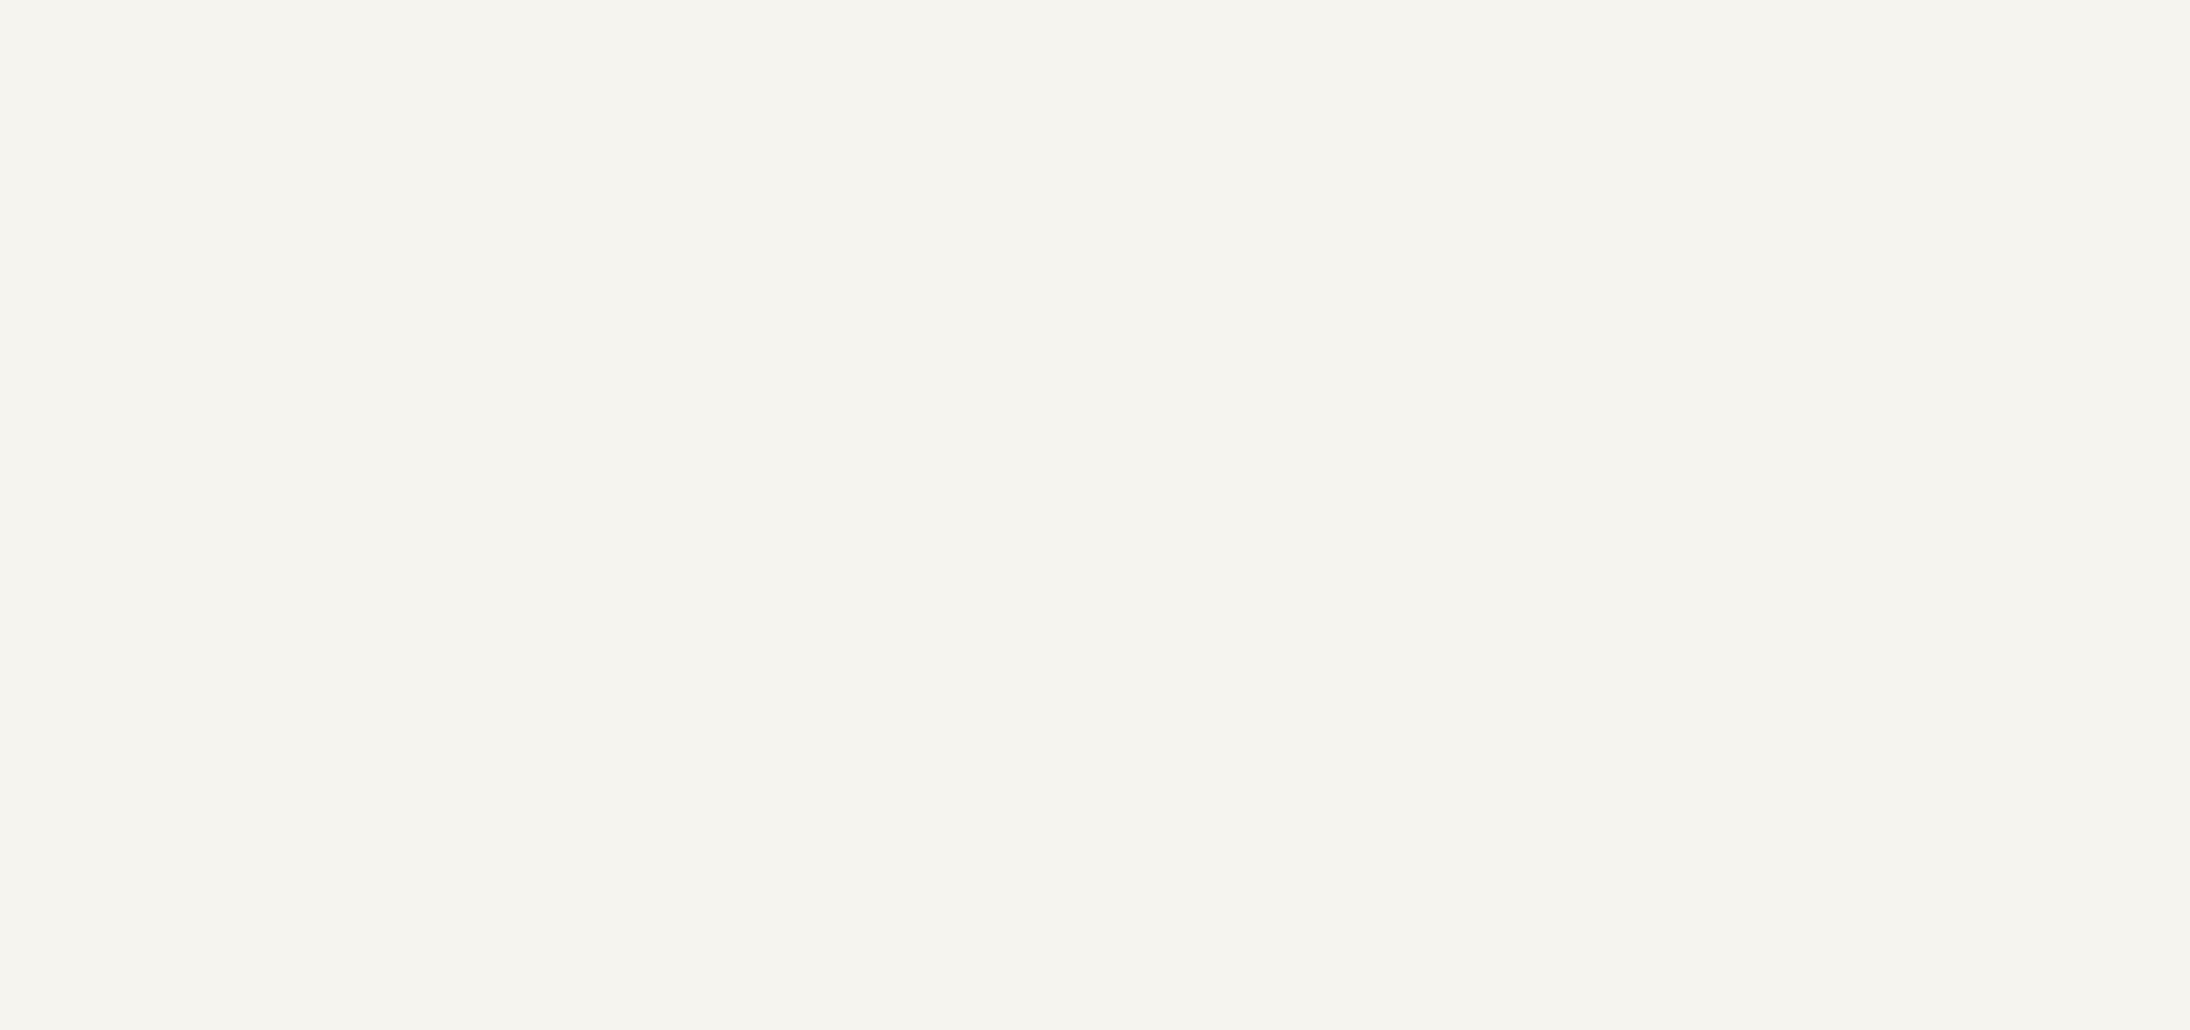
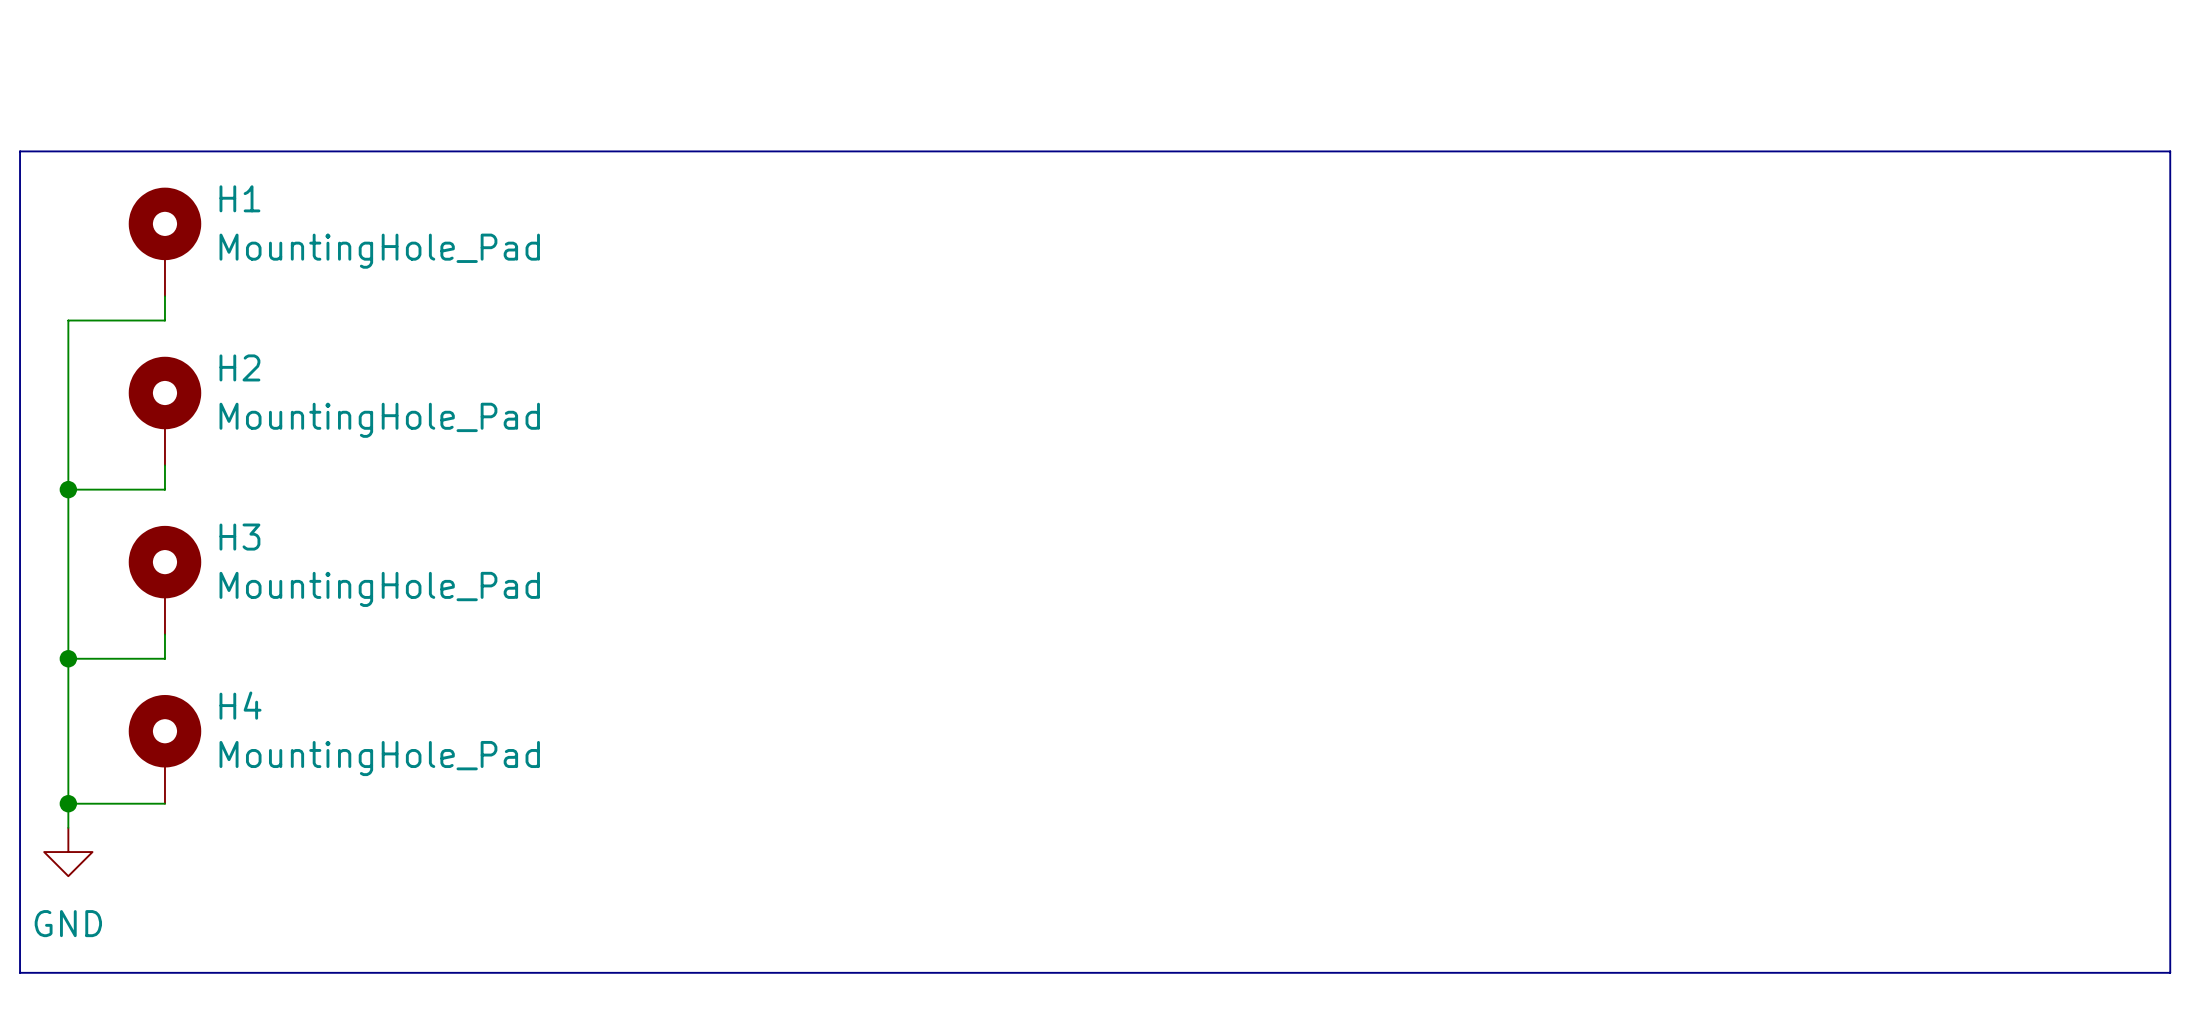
line: none -> (20, 151) (2170, 151) (2170, 972) (20, 972) (20, 151)
H1: none -> MountingHole_Pad (164, 242)
wire: none -> (164, 296) (164, 320) (68, 320) (68, 827)
H2: none -> MountingHole_Pad (164, 411)
wire: none -> (164, 465) (164, 489) (68, 489)
junction: none -> (68, 489)
H3: none -> MountingHole_Pad (164, 580)
wire: none -> (164, 634) (164, 658) (68, 658)
junction: none -> (68, 658)
H4: none -> MountingHole_Pad (164, 749)
wire: none -> (68, 803) (164, 803)
junction: none -> (68, 803)
power symbol: none -> GND (68, 852)

